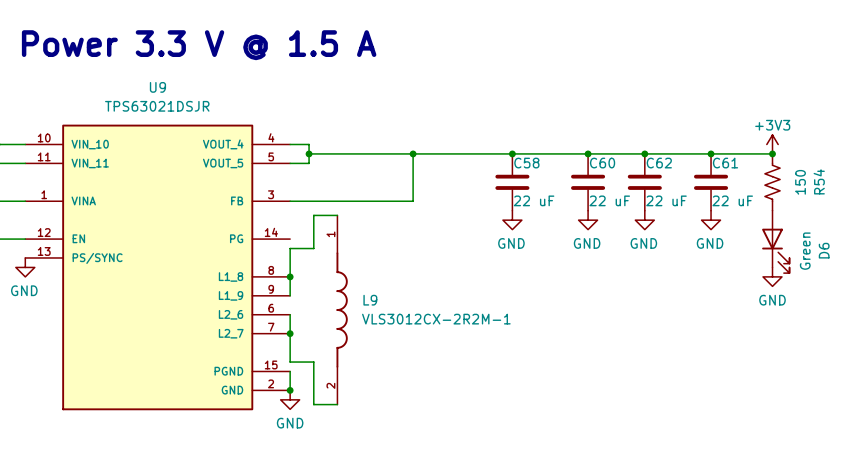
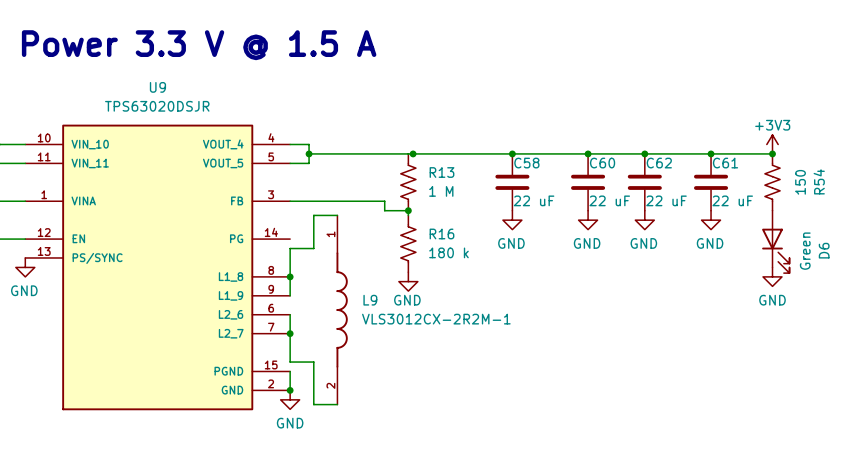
U9 value: TPS63021DSJR (157, 106) -> TPS63020DSJR (157, 106)
wire: (413, 153) (413, 201) (384, 201) -> (408, 215) (408, 210) (384, 210) (384, 201)
R13: none -> 1 M (408, 182)
junction: none -> (408, 210)
R16: none -> 180 k (408, 243)
power symbol: none -> GND (408, 281)

